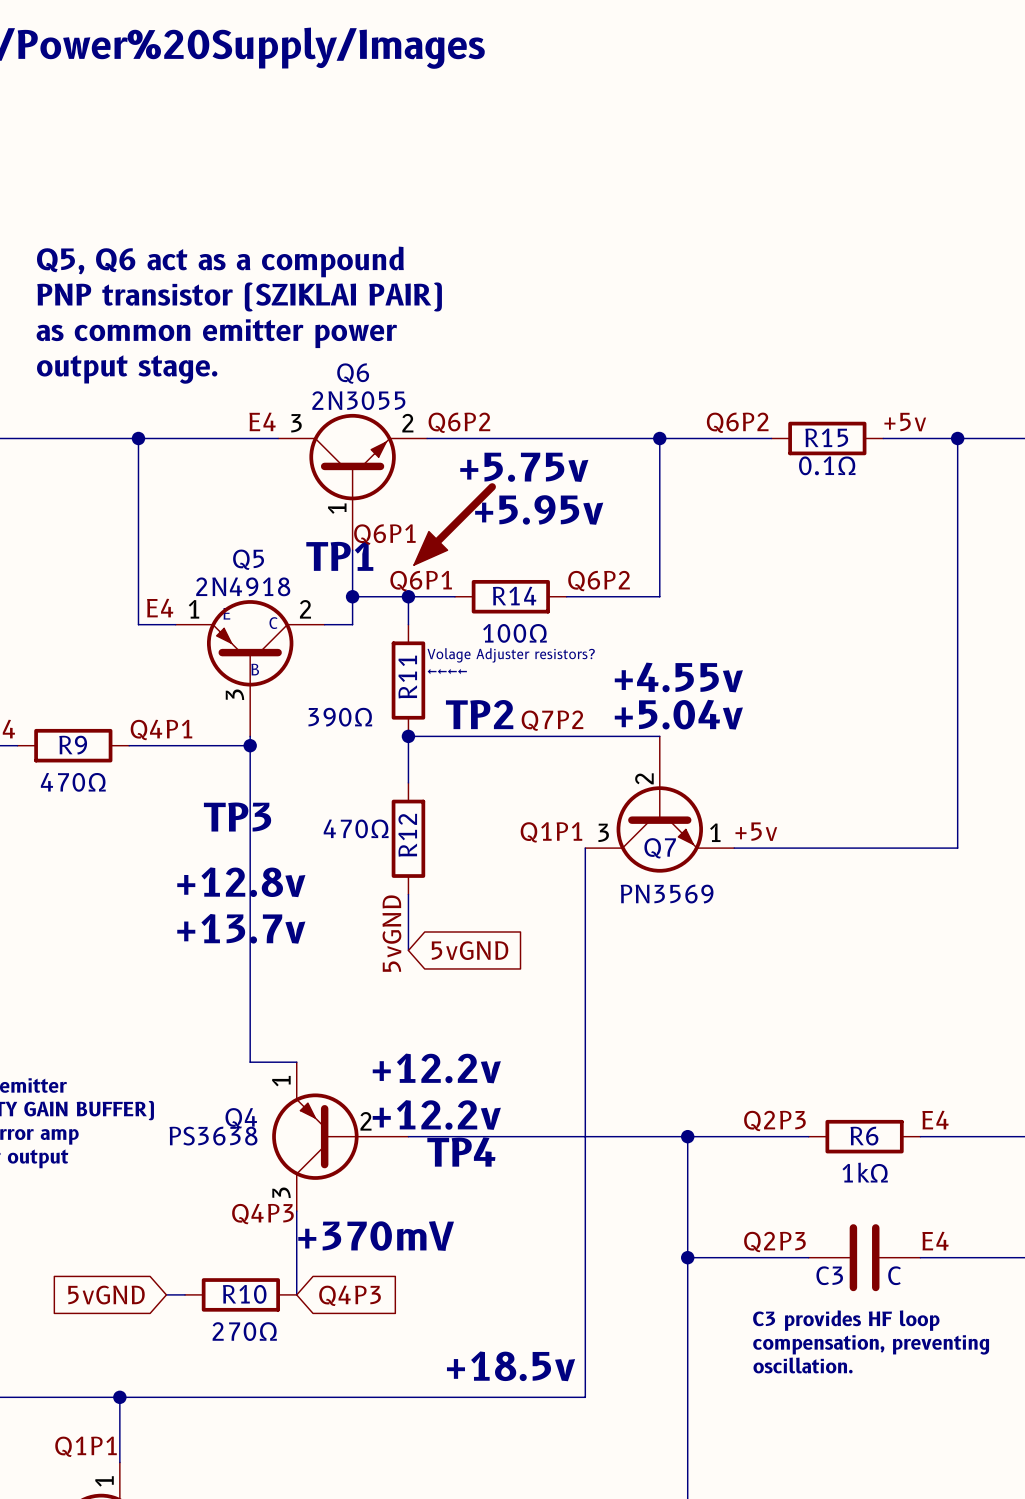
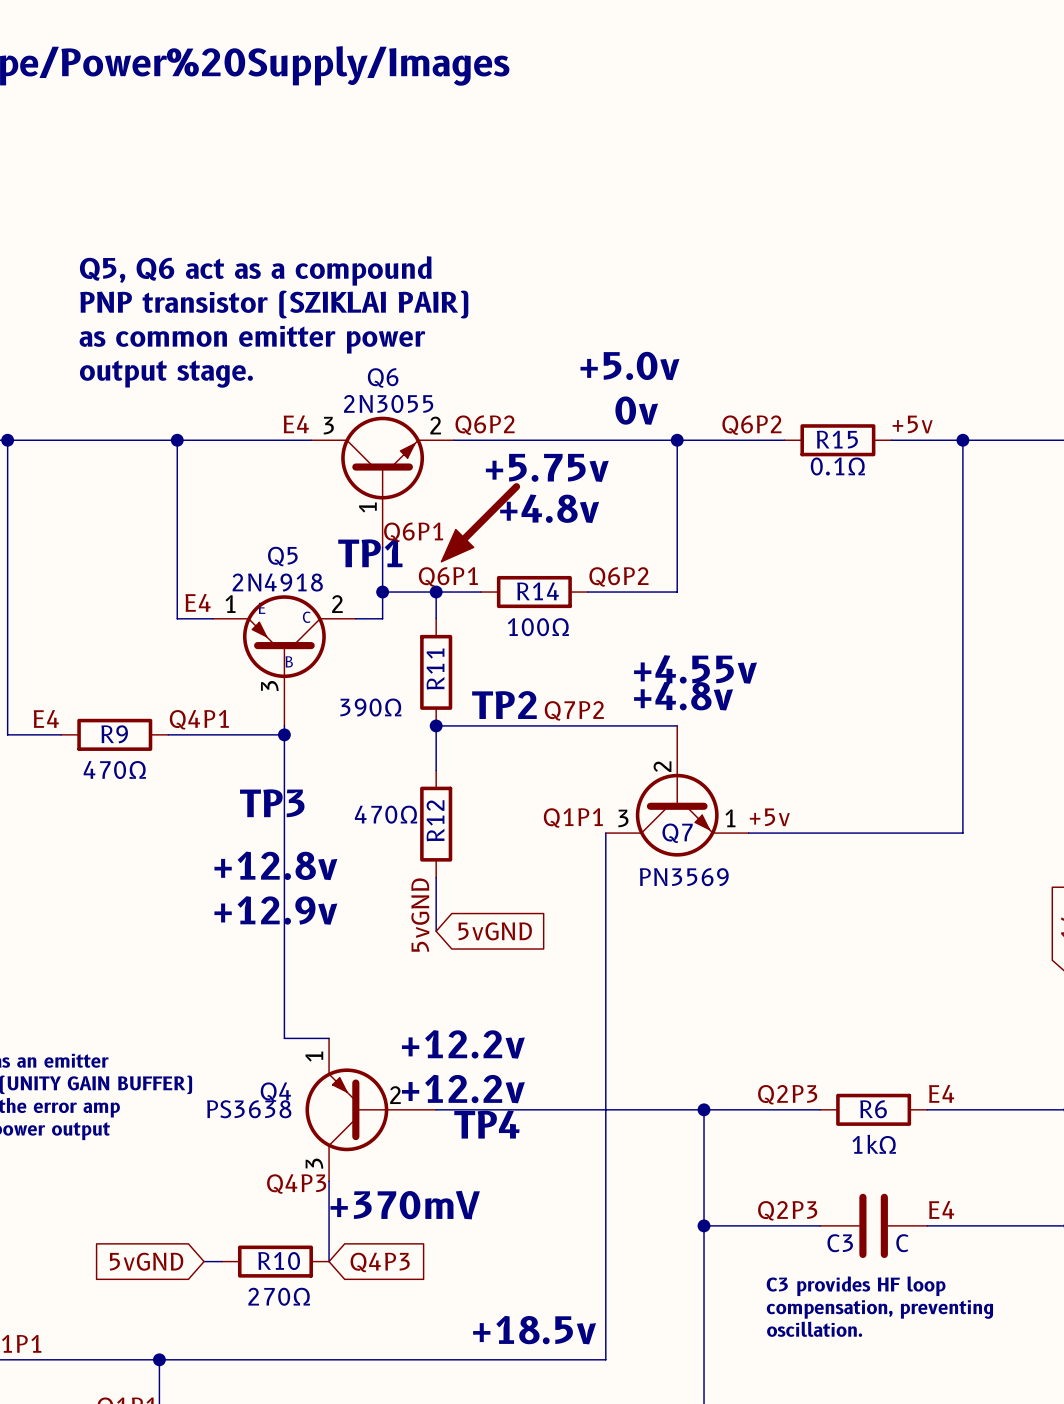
text: none -> +5.0v (629, 365)
text: none -> 0v (636, 410)
text: +5.95v (539, 510) -> +4.8v (549, 508)
text: Volage Adjuster resistors? (511, 655) -> none
text: ←←←← (447, 671) -> none
text: +5.04v (678, 714) -> +4.8v (683, 696)
text: +13.7v (241, 928) -> +12.9v (275, 910)

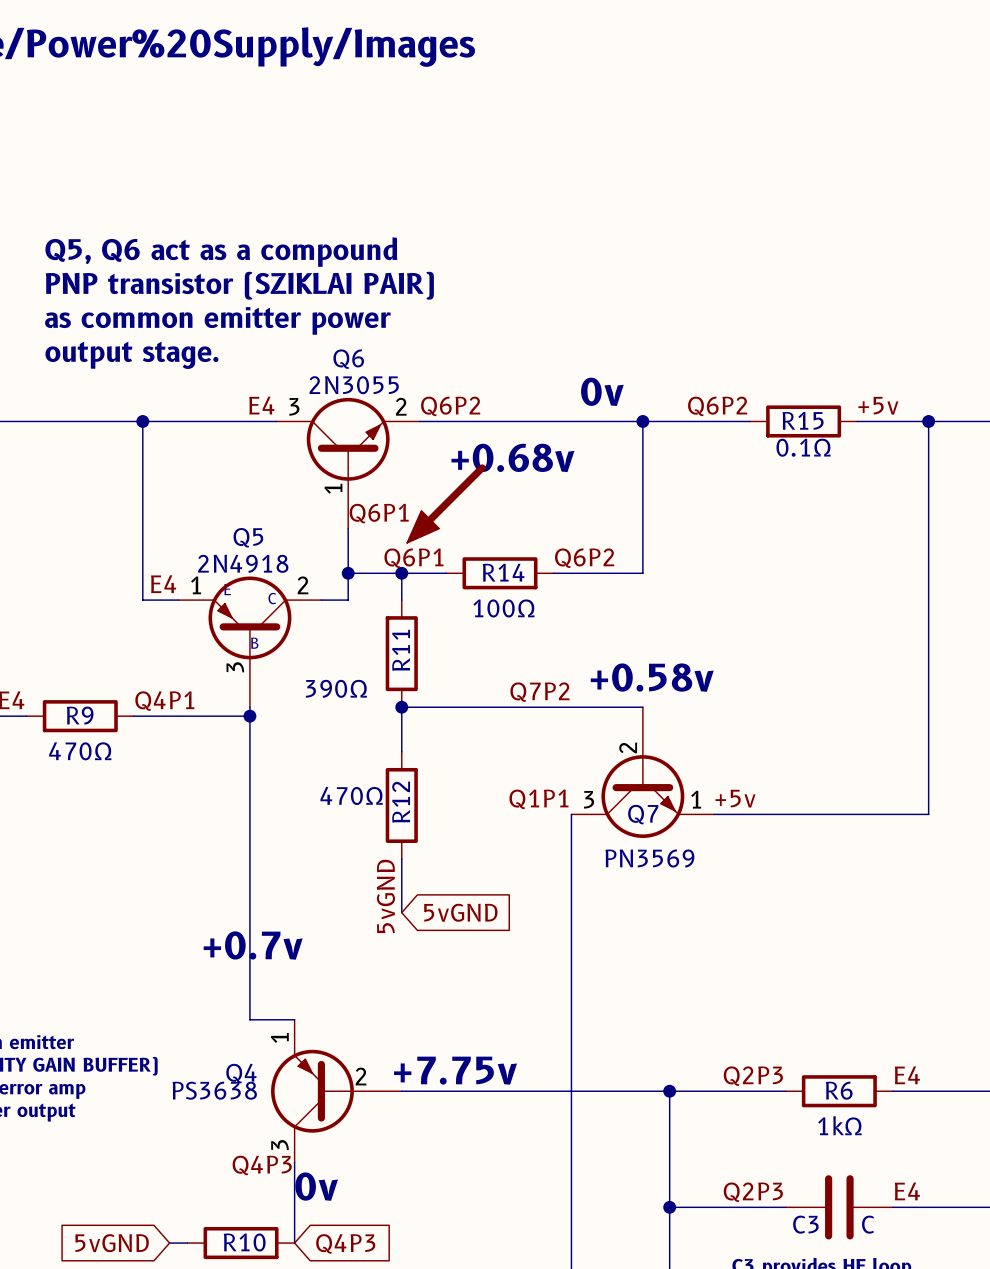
text: +5.0v (629, 365) -> none
text: +5.75v (547, 467) -> +0.68v (512, 457)
text: +4.8v (549, 508) -> none
text: TP1 (370, 553) -> none
text: +4.55v (695, 669) -> none
text: +4.8v (683, 696) -> +0.58v (652, 677)
text: TP2 (504, 705) -> none
text: TP3 (272, 803) -> none
text: +12.8v (275, 865) -> none
text: +12.9v (275, 910) -> none
text: none -> +0.7v (253, 945)
text: +12.2v (463, 1044) -> none
text: +12.2v (463, 1089) -> none
text: none -> +7.75v (455, 1070)
text: TP4 (486, 1124) -> none
text: +370mV (405, 1205) -> 0v (316, 1186)

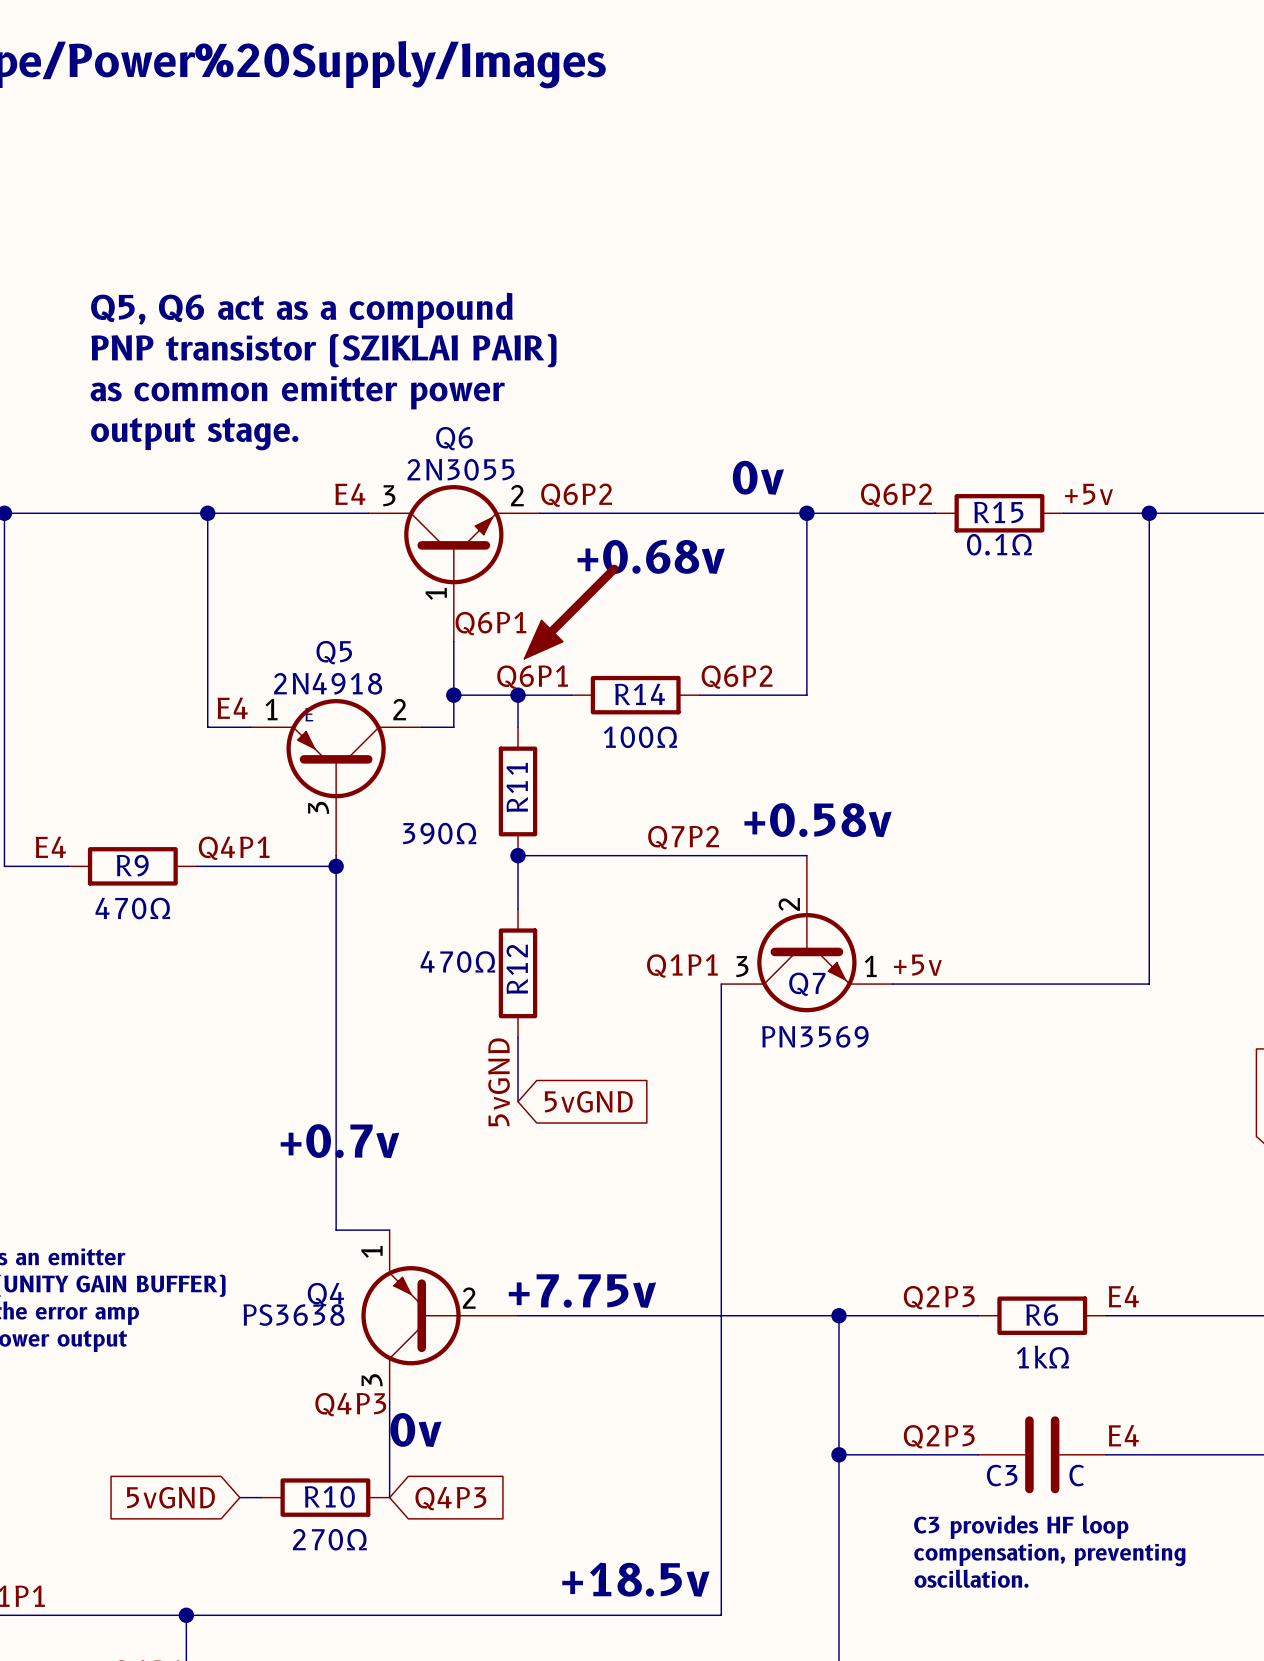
text: C (272, 598) -> none
text: B (254, 643) -> none

